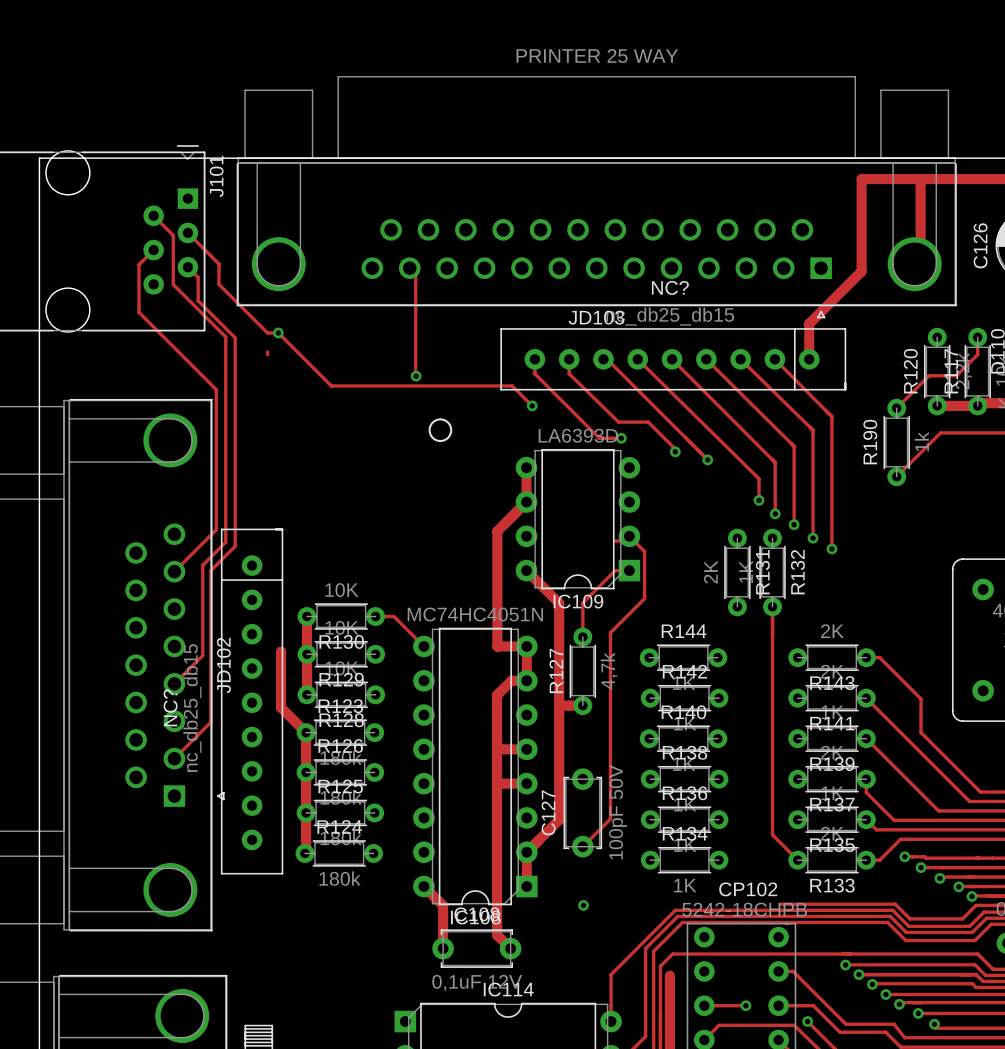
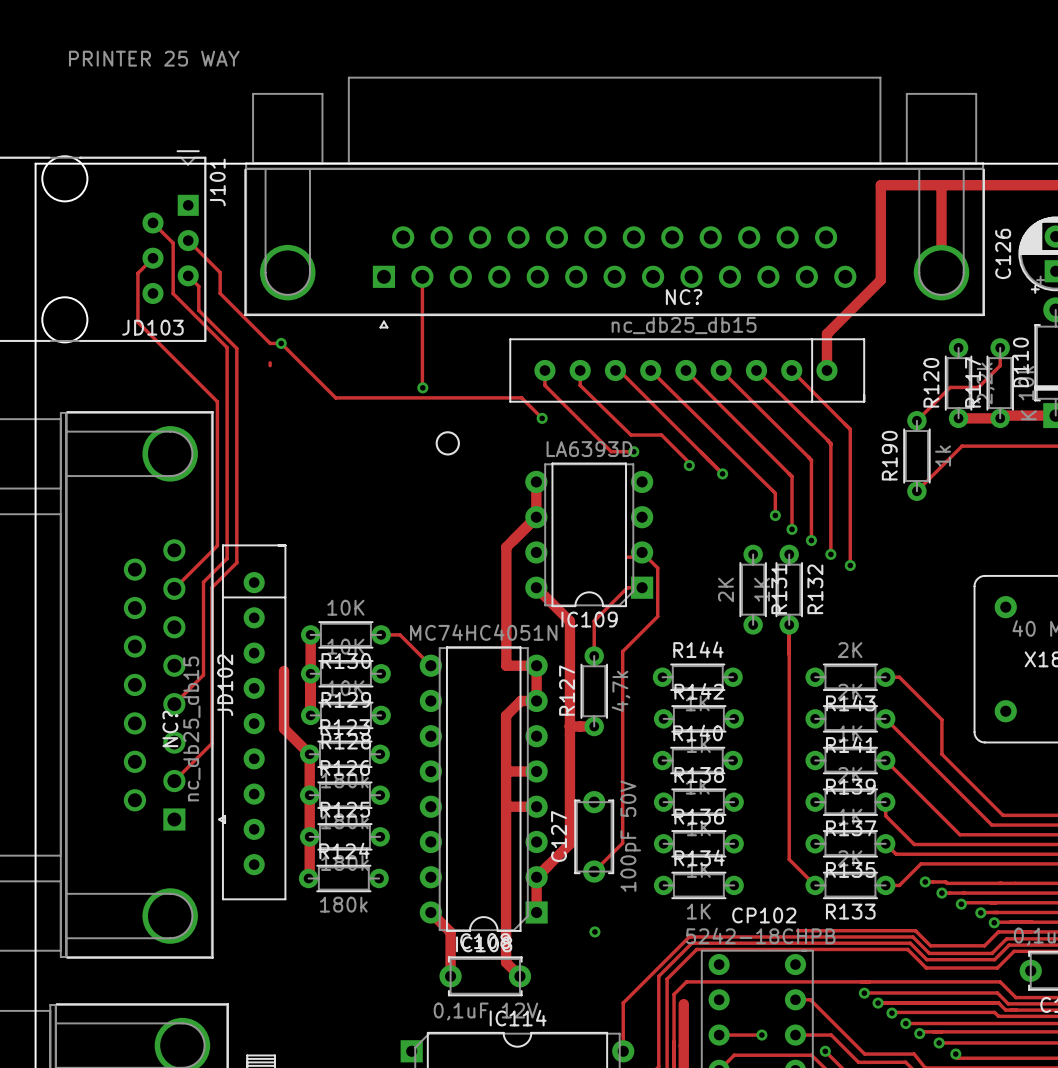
JD103 value position: PRINTER 25 WAY (597, 55) -> PRINTER 25 WAY (154, 58)
JD103 footprint: [236, 76, 957, 319] -> [244, 76, 985, 329]
JD103 name position: JD103 (596, 317) -> JD103 (152, 327)

